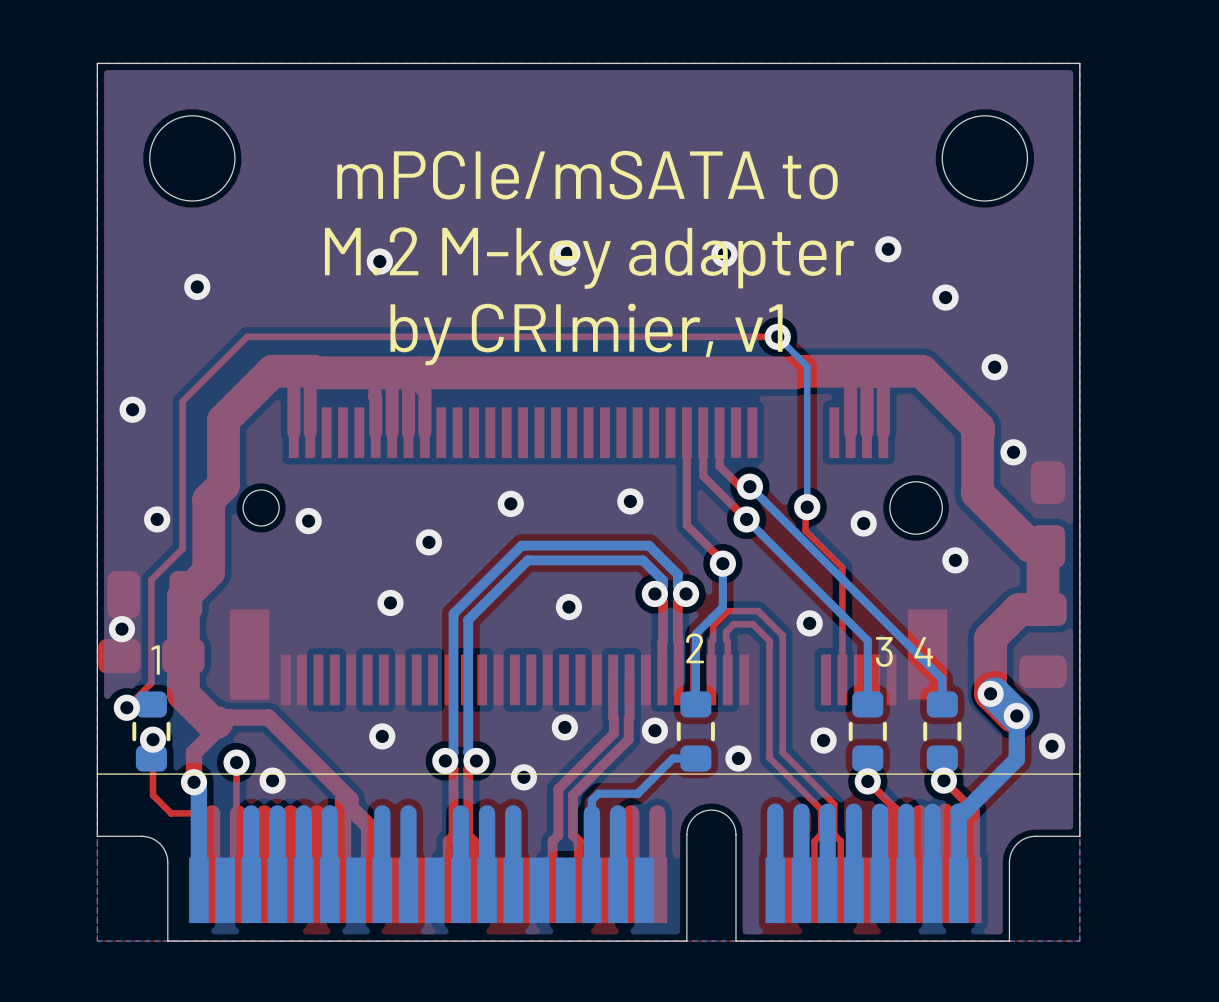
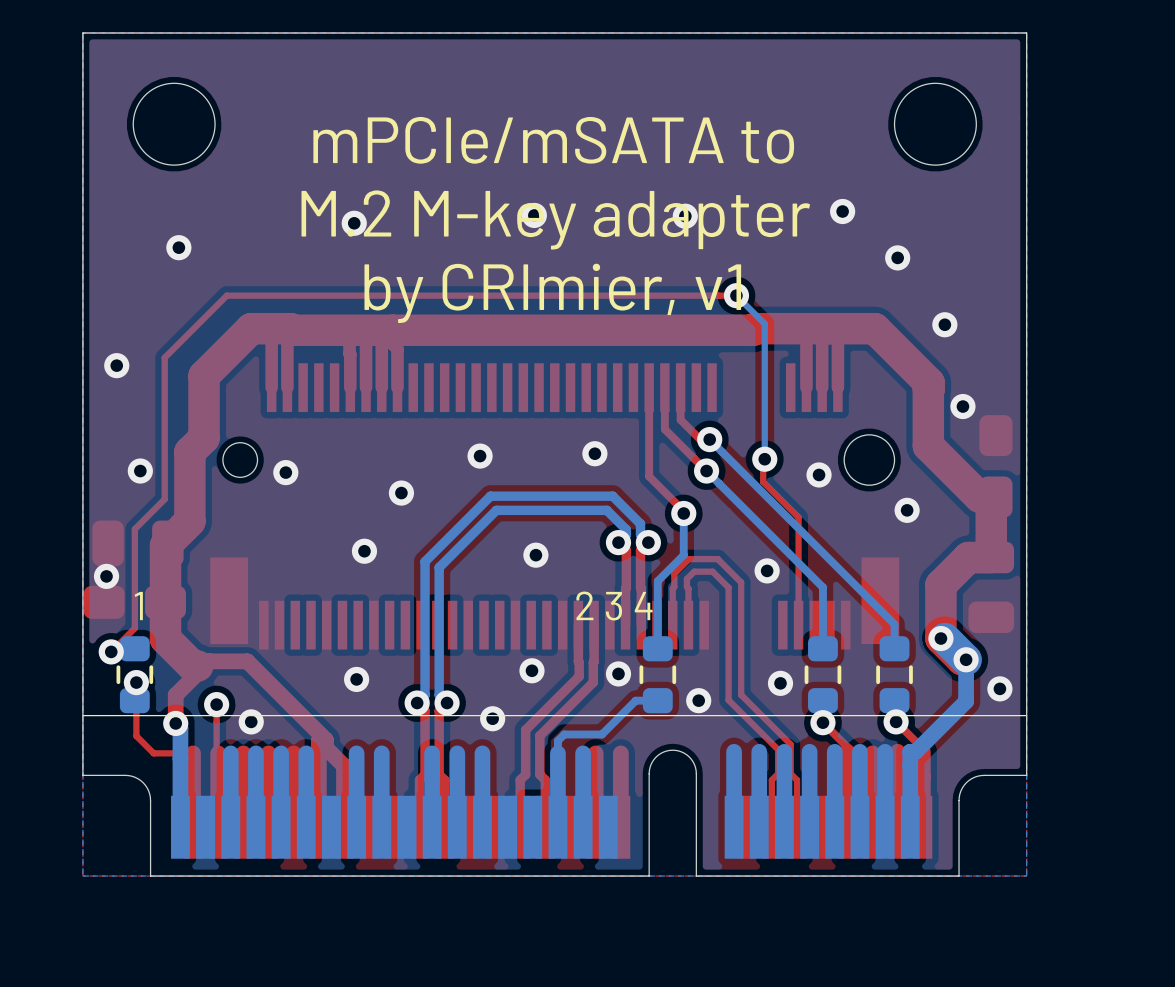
text: 2 (695, 648) -> none
text: 3 4 (904, 651) -> none
text: none -> 2 3 4 (614, 606)

